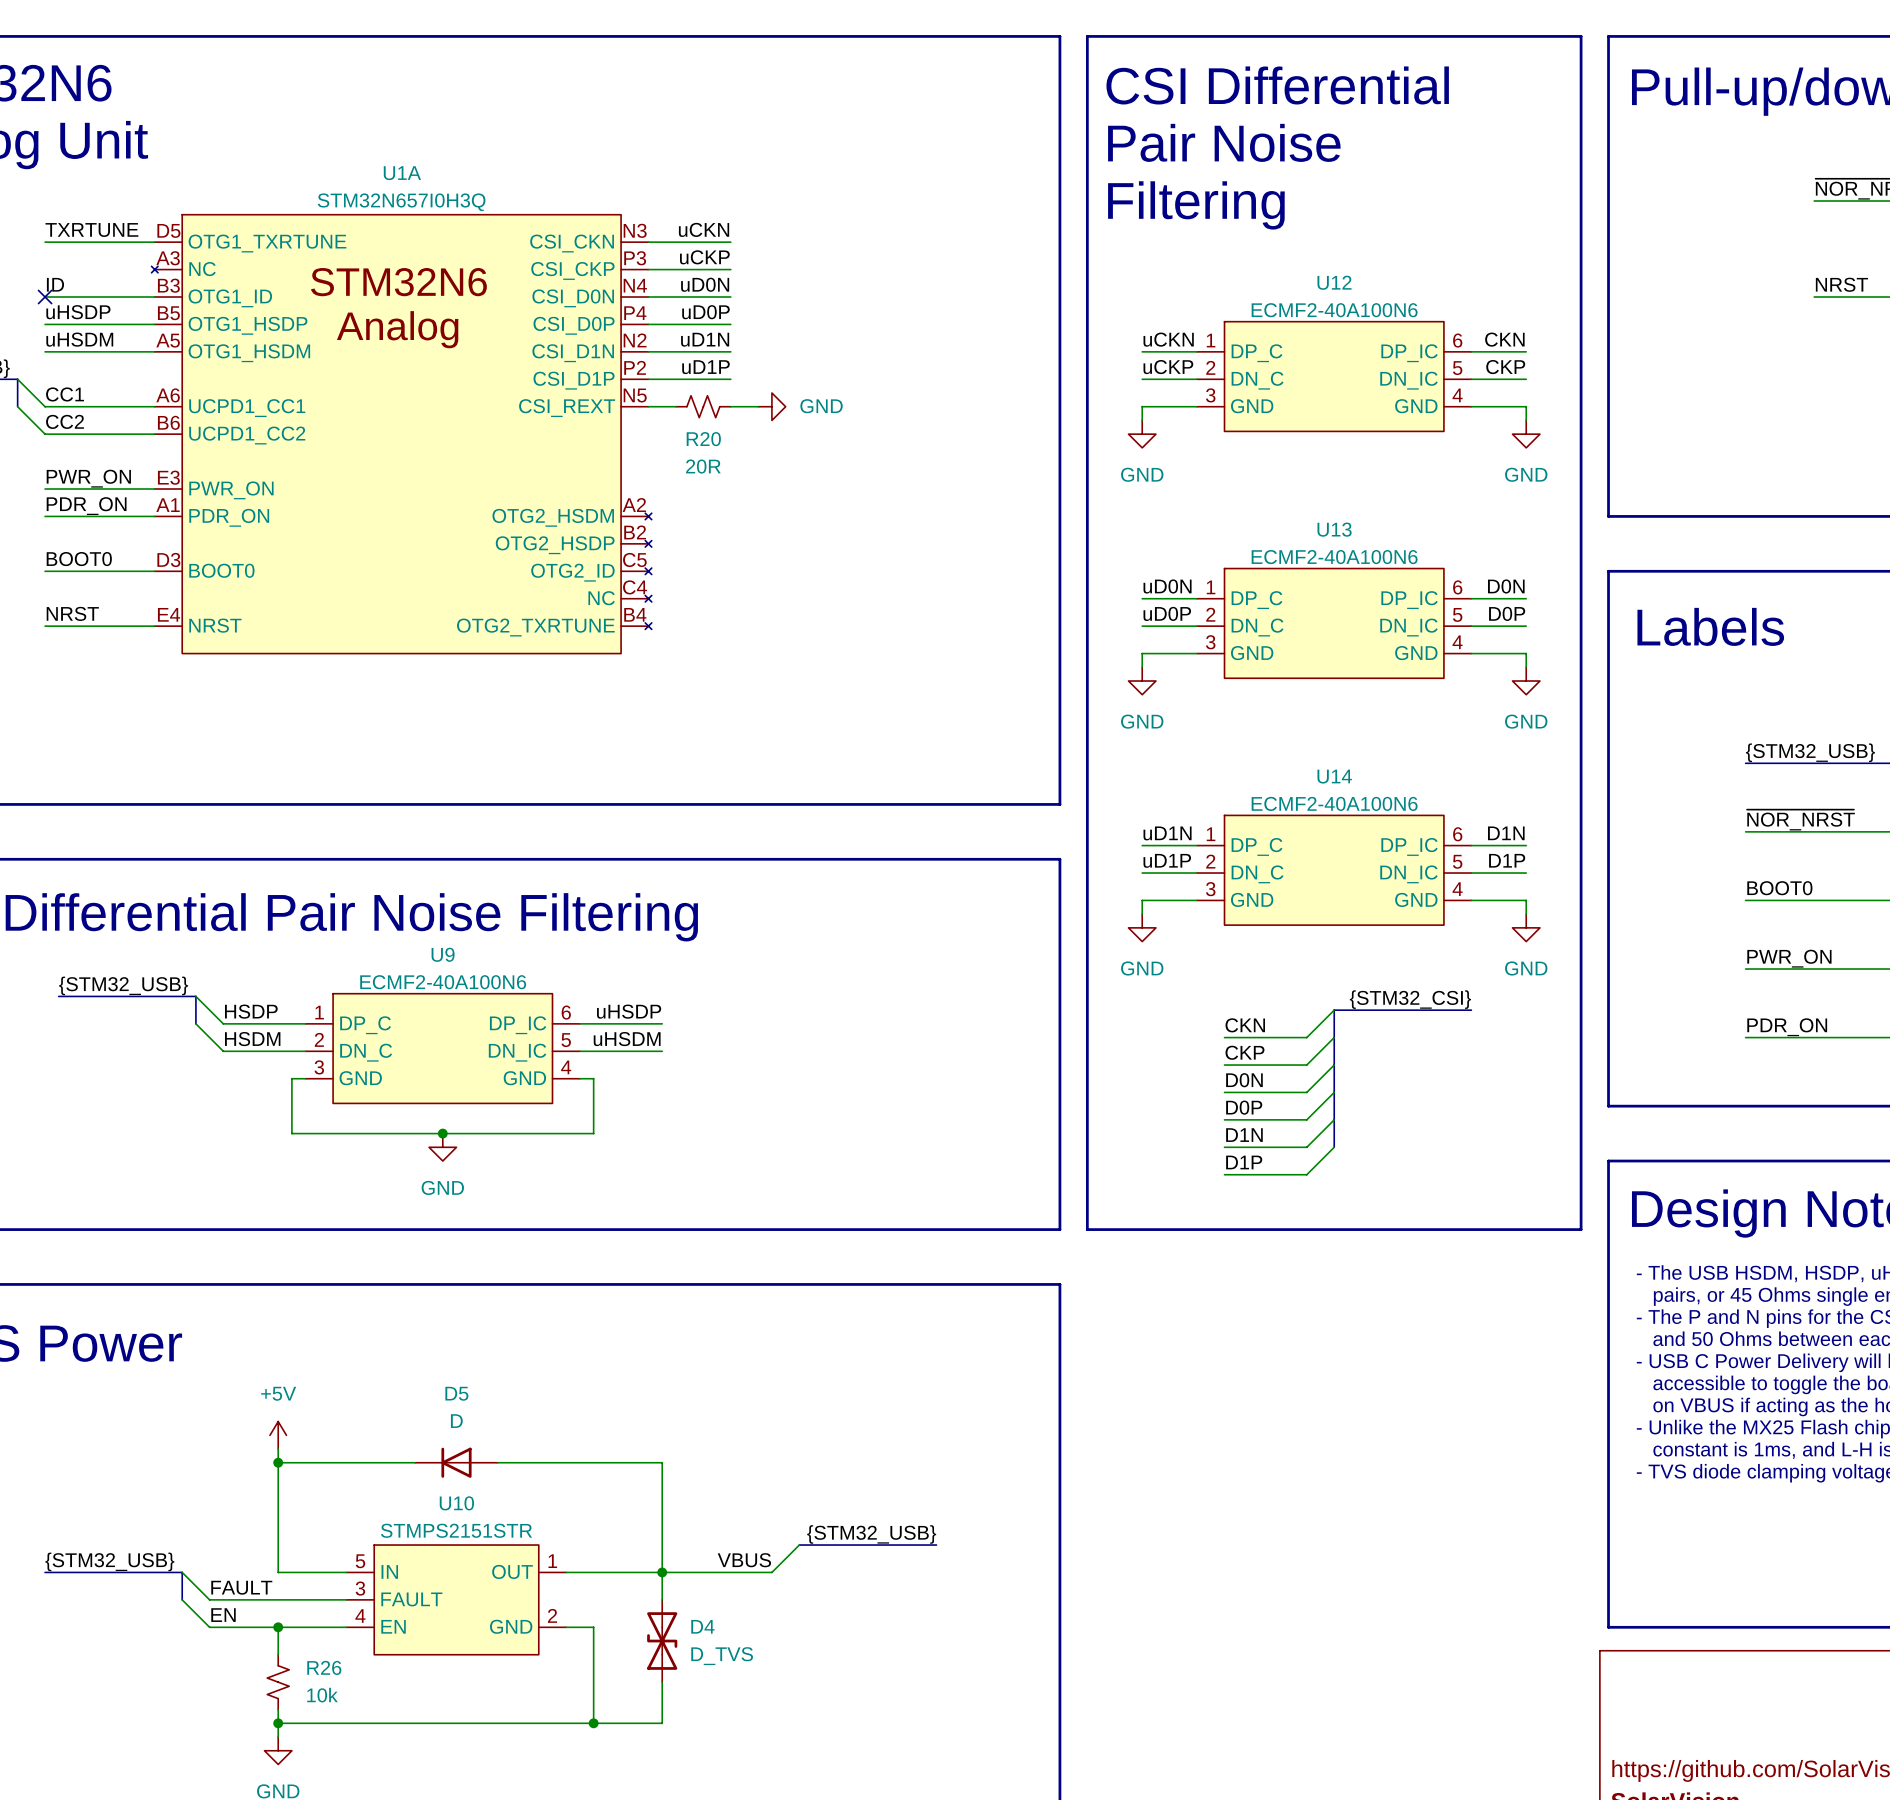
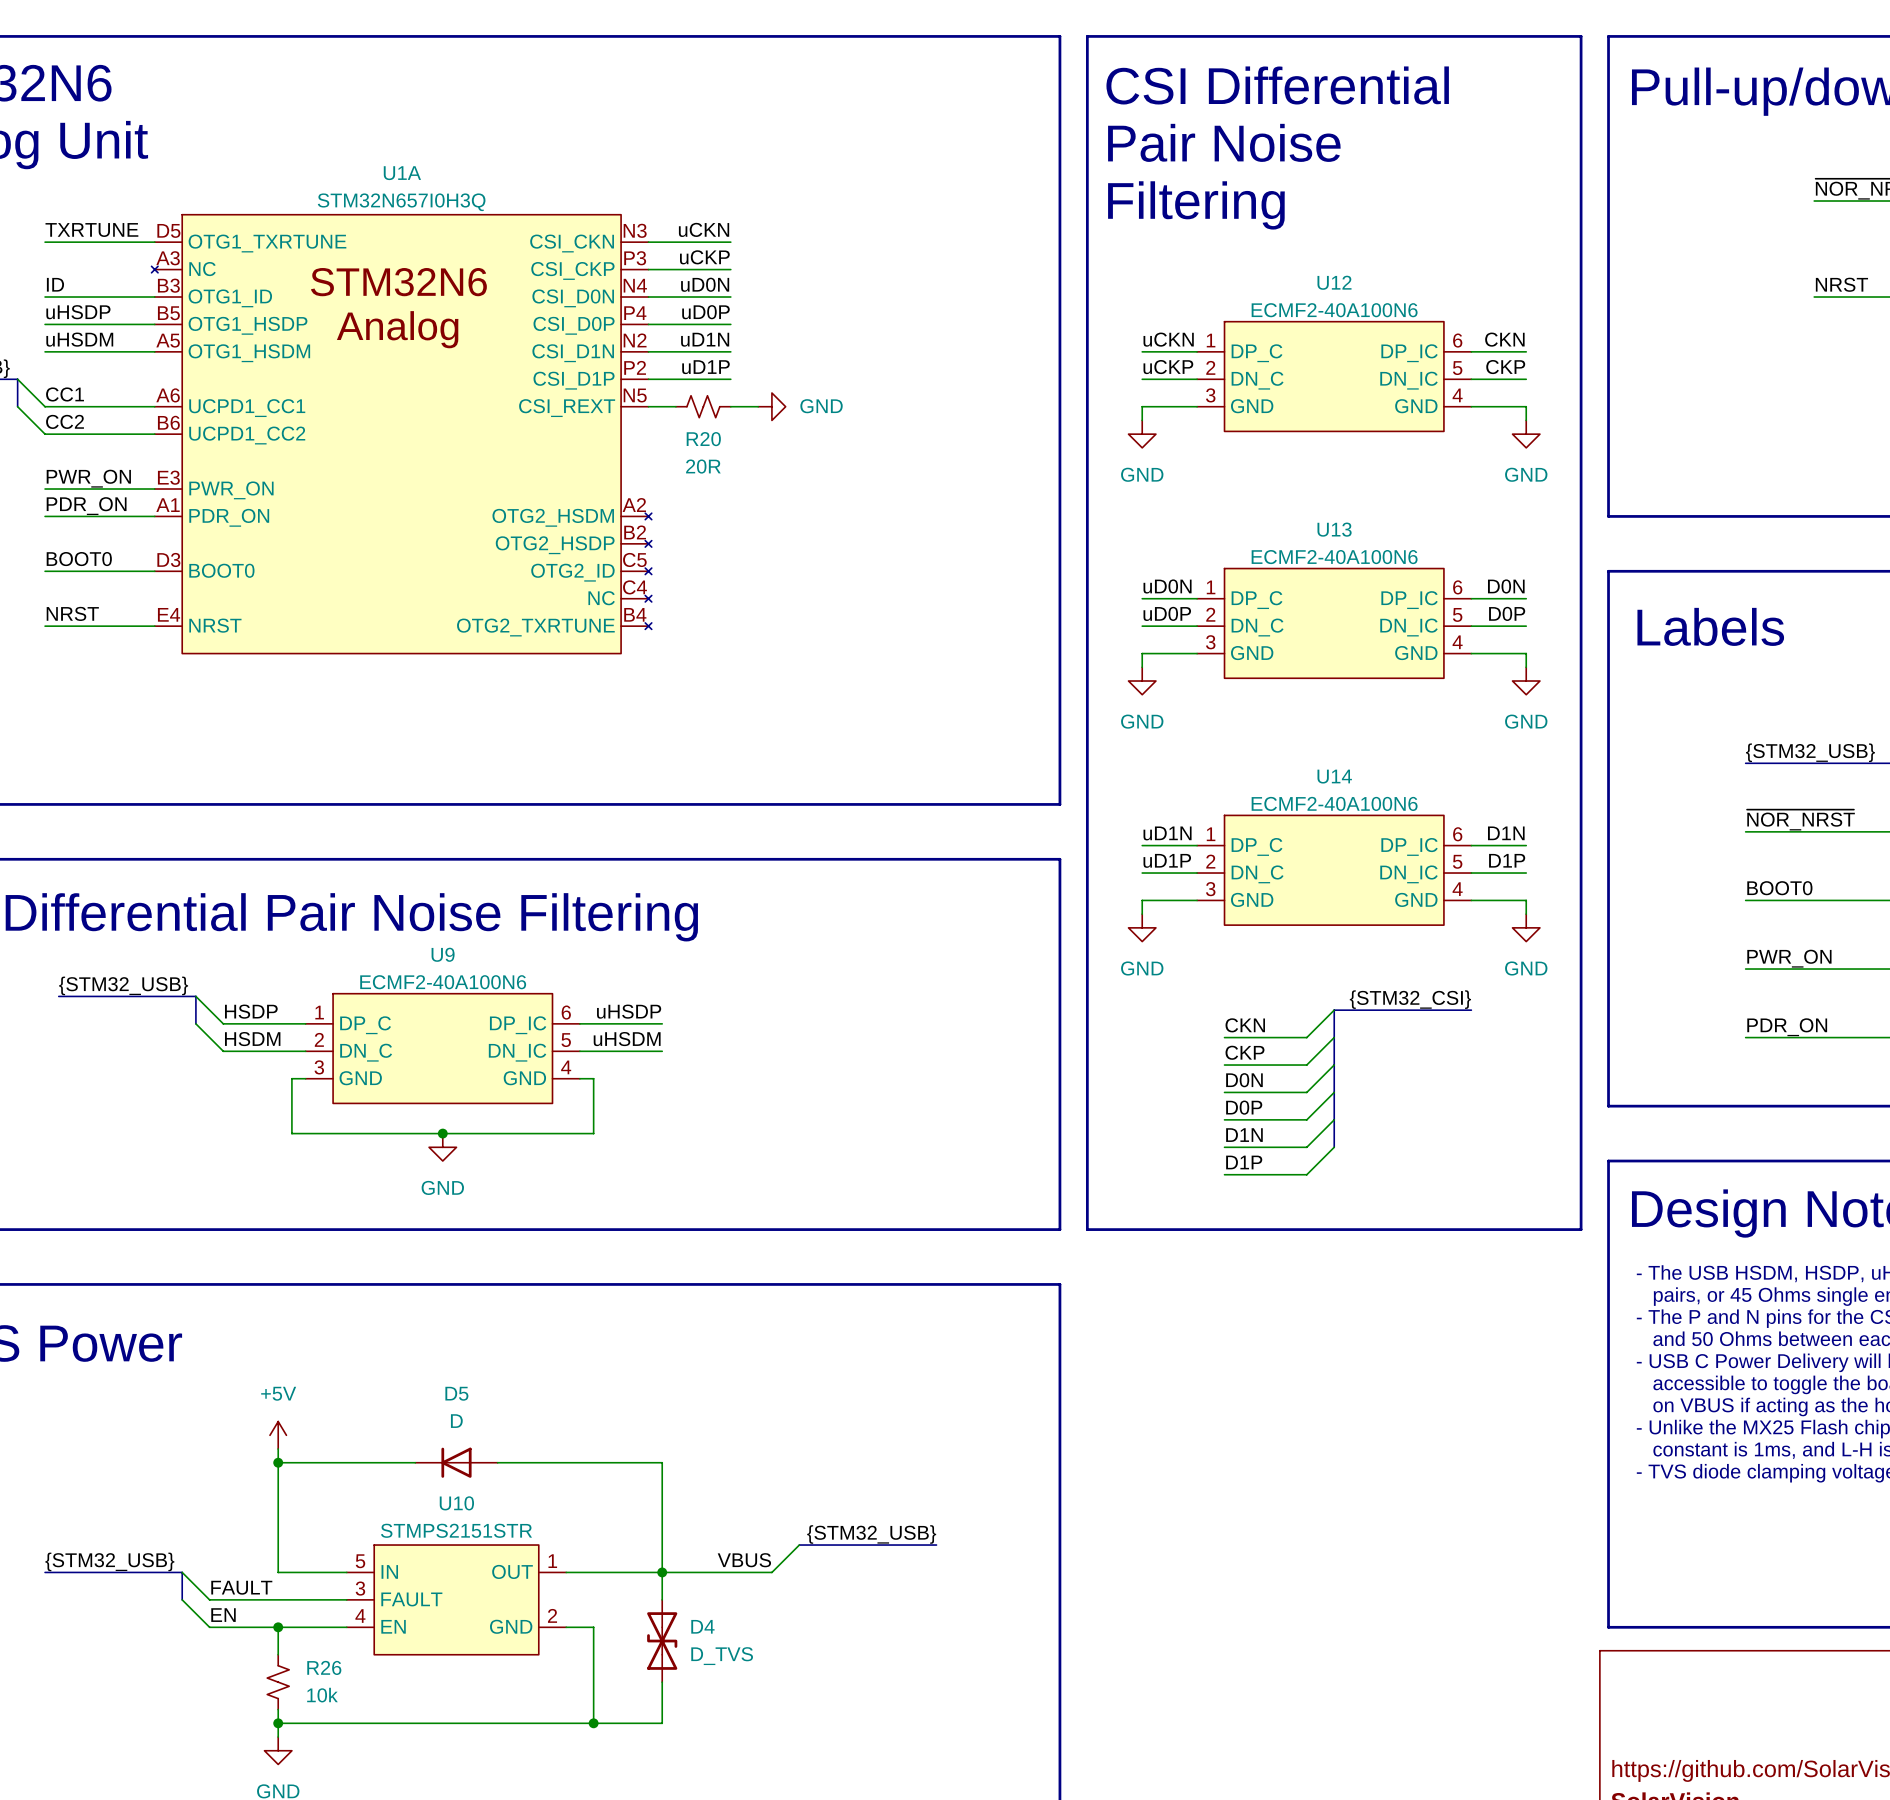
no-connect mark: (45, 297) -> none

